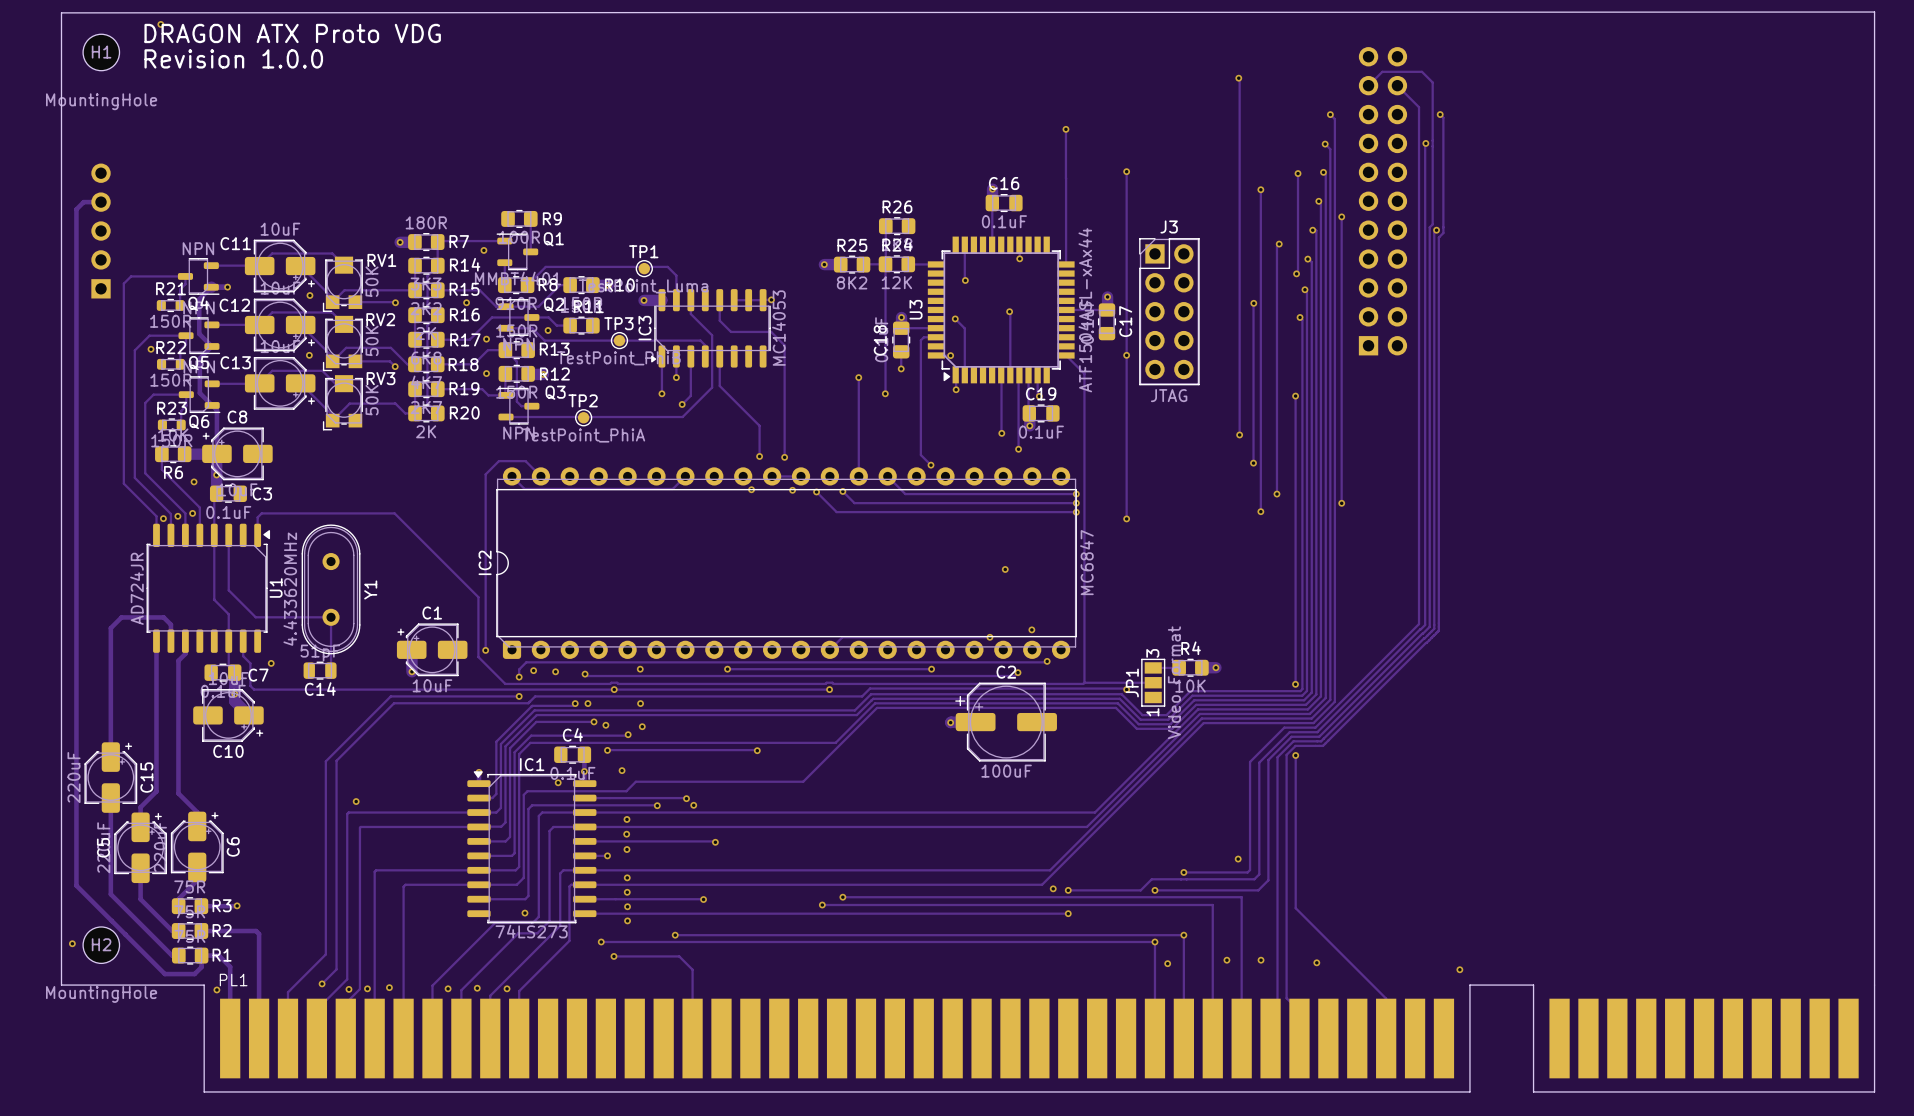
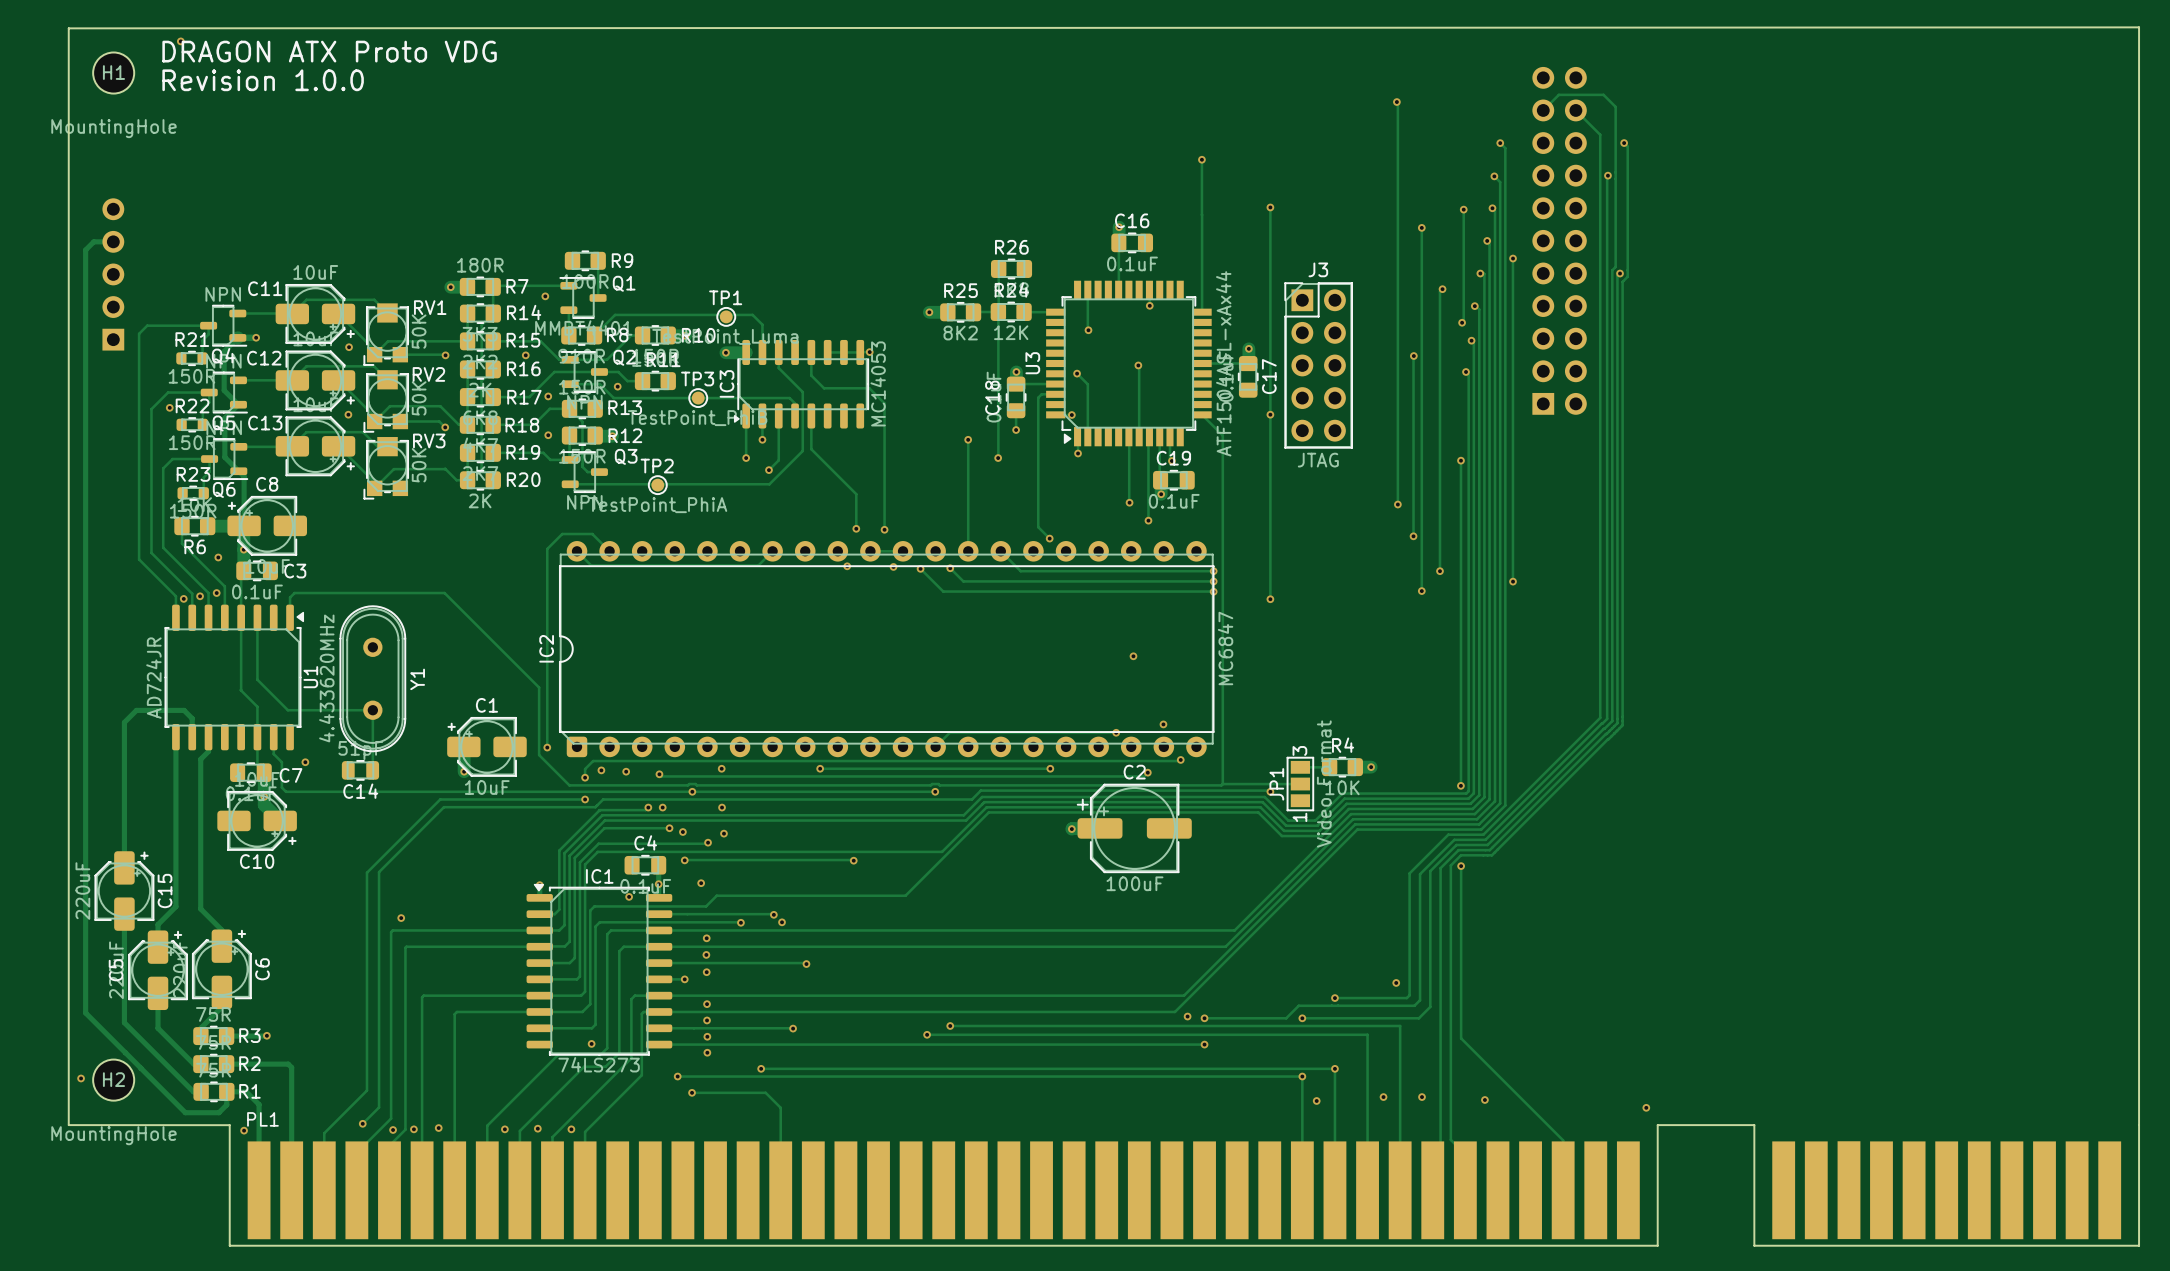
board edge: (1874, 12) (1874, 985) -> (2114, 27) (2139, 27) (2139, 1125)
PL1 footprint: [203, 984, 1875, 1093] -> [229, 1124, 2140, 1247]

